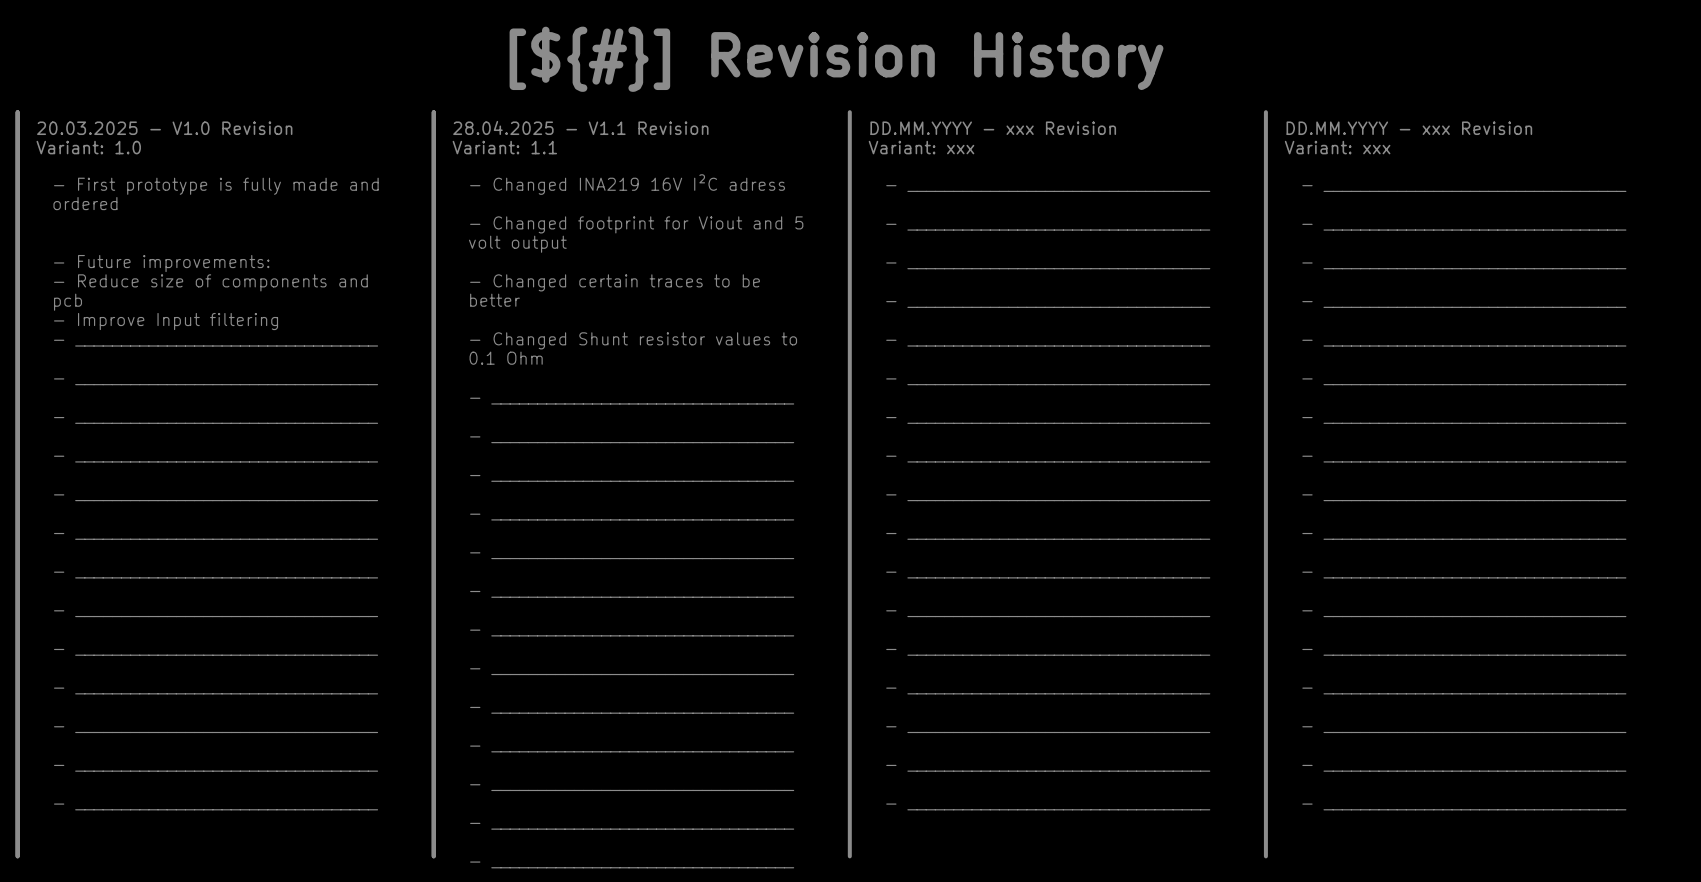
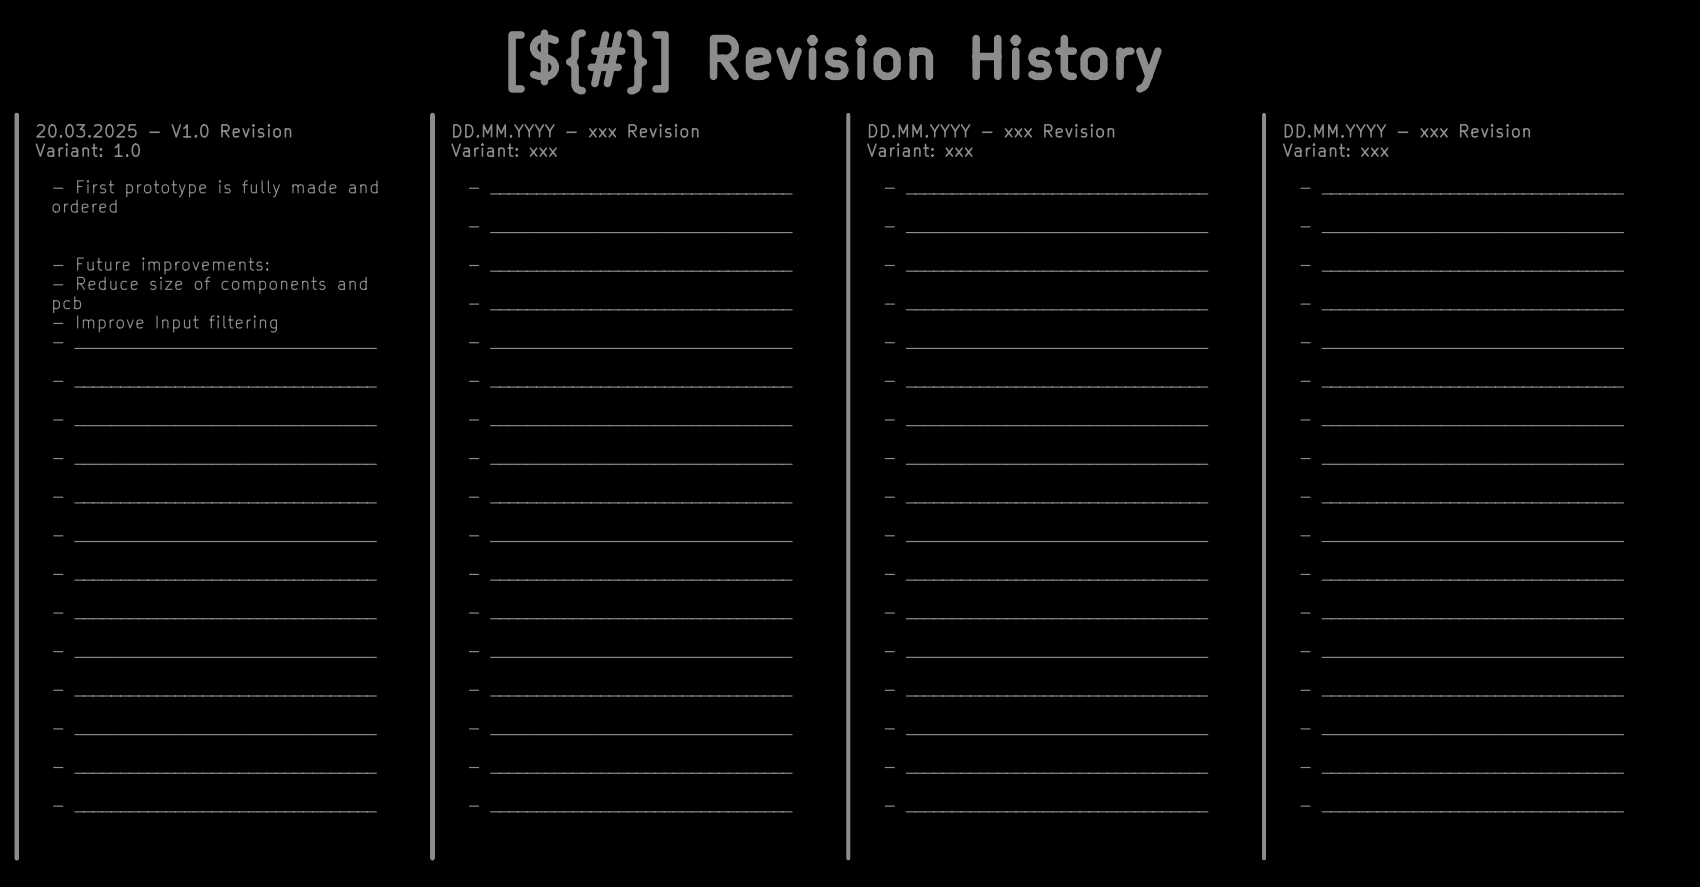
text: 28.04.2025 - V1.1 Revision (580, 127) -> DD.MM.YYYY - xxx Revision (575, 130)
text: Variant: 1.1 (504, 147) -> Variant: xxx (504, 150)
text: - Changed INA219 16V I²C adress (627, 184) -> - _________________________________ (630, 191)
text: - Changed footprint for Viout and 5 (636, 224) -> - _________________________________ (630, 229)
text: volt output (517, 244) -> none
text: none -> - _________________________________ (630, 268)
text: - Changed certain traces to be (615, 282) -> none
text: better (494, 300) -> - _________________________________ (630, 306)
text: - Changed Shunt resistor values to (633, 340) -> - _________________________________ (630, 345)
text: 0.1 Ohm (506, 358) -> none
text: none -> - _________________________________ (630, 384)
text: - _________________________________ (632, 401) -> none
text: none -> - _________________________________ (630, 422)
text: - _________________________________ (632, 439) -> none
text: none -> - _________________________________ (630, 461)
text: - _________________________________ (632, 478) -> none
text: none -> - _________________________________ (630, 500)
text: - _________________________________ (632, 517) -> none
text: none -> - _________________________________ (630, 538)
text: - _________________________________ (632, 555) -> none
text: none -> - _________________________________ (630, 577)
text: - _________________________________ (632, 594) -> none
text: none -> - _________________________________ (630, 615)
text: - _________________________________ (632, 633) -> none
text: none -> - _________________________________ (630, 654)
text: - _________________________________ (632, 671) -> none
text: none -> - _________________________________ (630, 693)
text: - _________________________________ (632, 710) -> none
text: none -> - _________________________________ (630, 731)
text: - _________________________________ (632, 748) -> none
text: none -> - _________________________________ (630, 770)
text: - _________________________________ (632, 787) -> none
text: none -> - _________________________________ (630, 808)
text: - _________________________________ (632, 826) -> none
text: - _________________________________ (632, 864) -> none

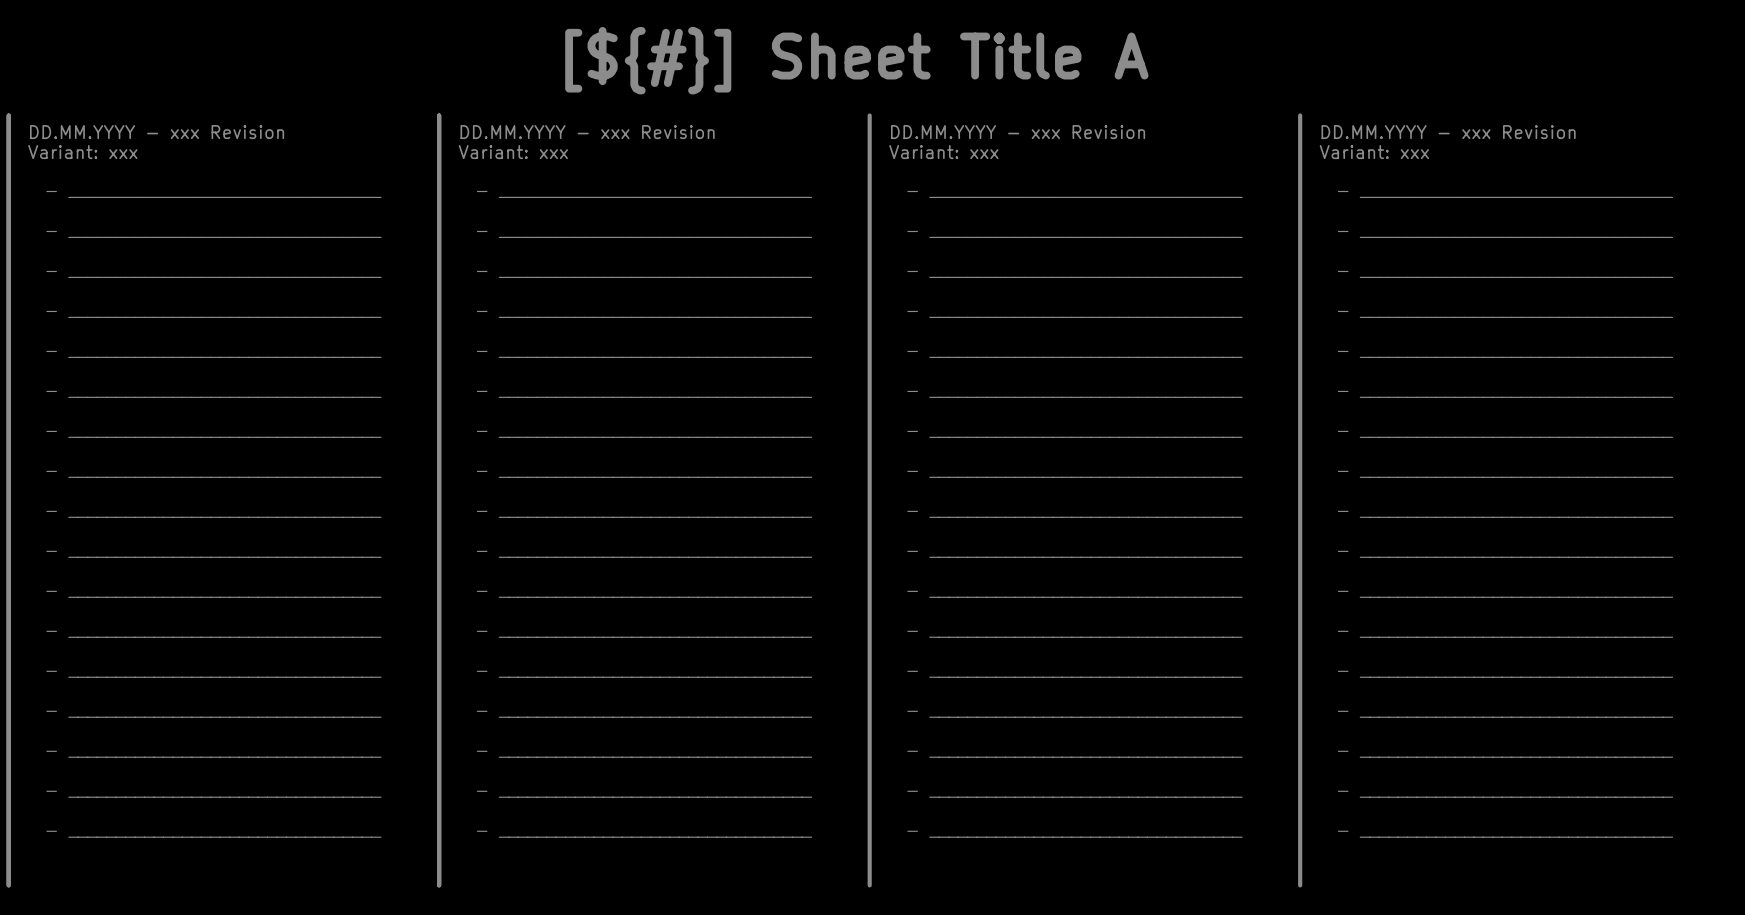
text: [${#}] Revision History (834, 61) -> [${#}] Sheet Title A (856, 60)
text: 20.03.2025 - V1.0 Revision (163, 130) -> DD.MM.YYYY - xxx Revision (157, 132)
text: Variant: 1.0 (87, 150) -> Variant: xxx (82, 152)
text: - First prototype is fully made and (215, 188) -> - _________________________________ (213, 194)
text: ordered (84, 206) -> none
text: none -> - _________________________________ (213, 234)
text: - Future improvements: (160, 266) -> - _________________________________ (213, 274)
text: - Reduce size of components and (209, 285) -> none
text: pcb (67, 304) -> - _________________________________ (213, 314)
text: - Improve Input filtering (165, 323) -> none

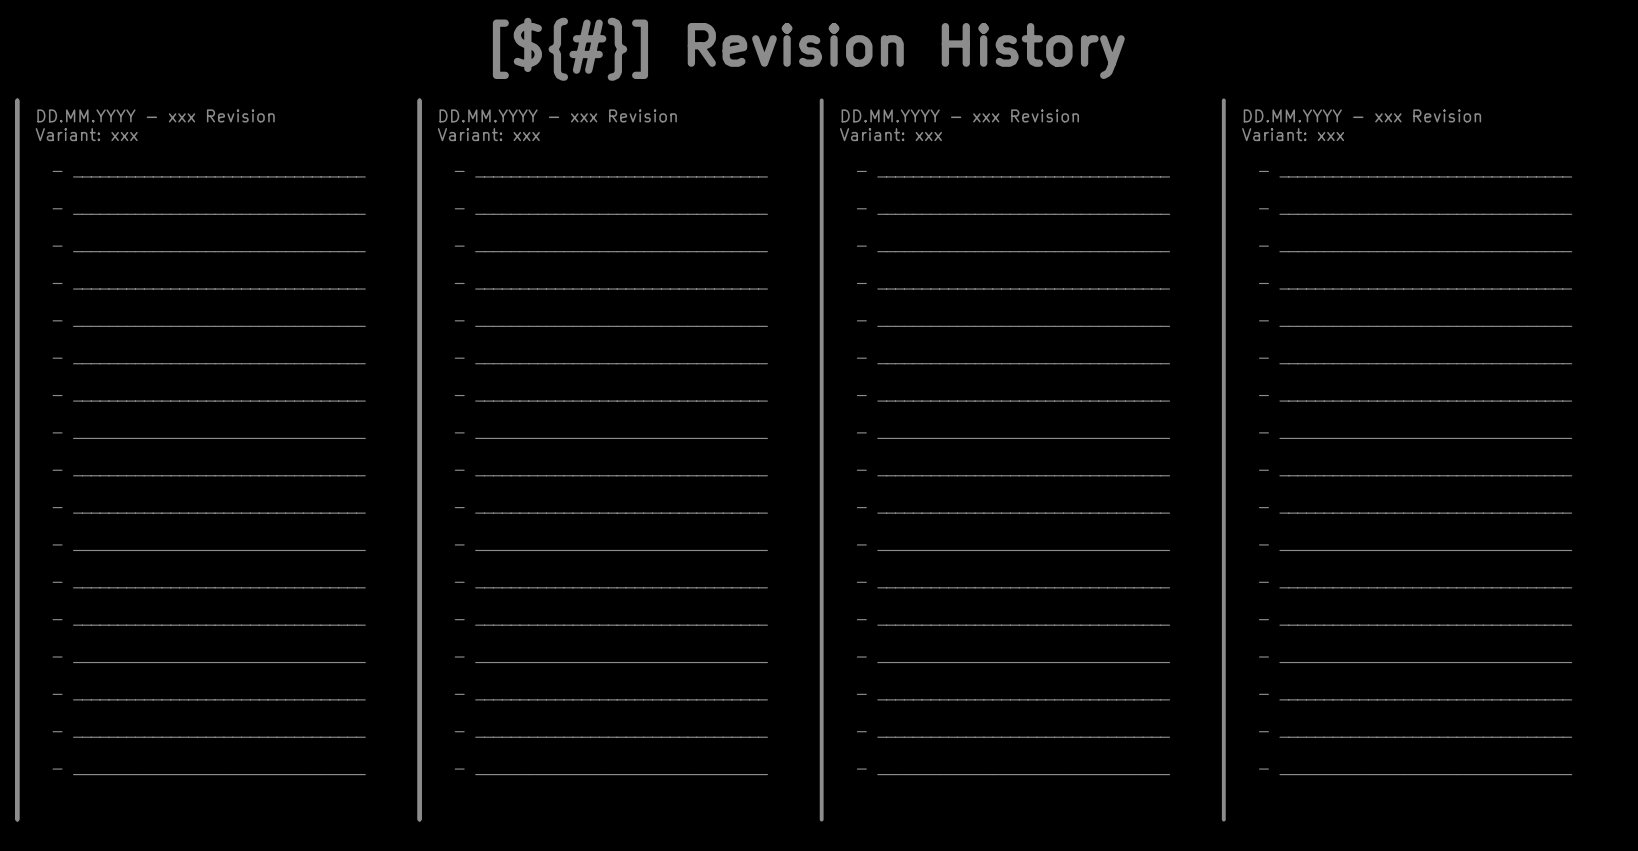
text: [${#}] Sheet Title A (856, 60) -> [${#}] Revision History (808, 49)

